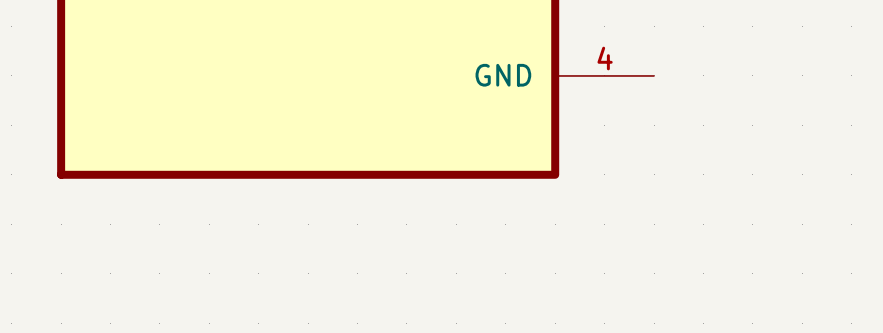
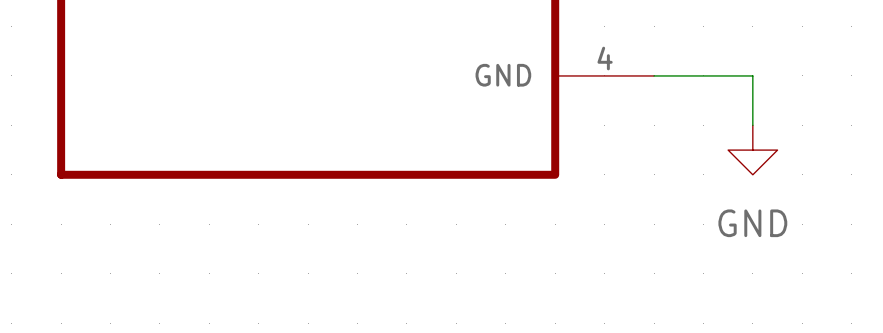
wire: none -> (654, 75) (752, 75) (752, 125)
power symbol: none -> GND (752, 150)

